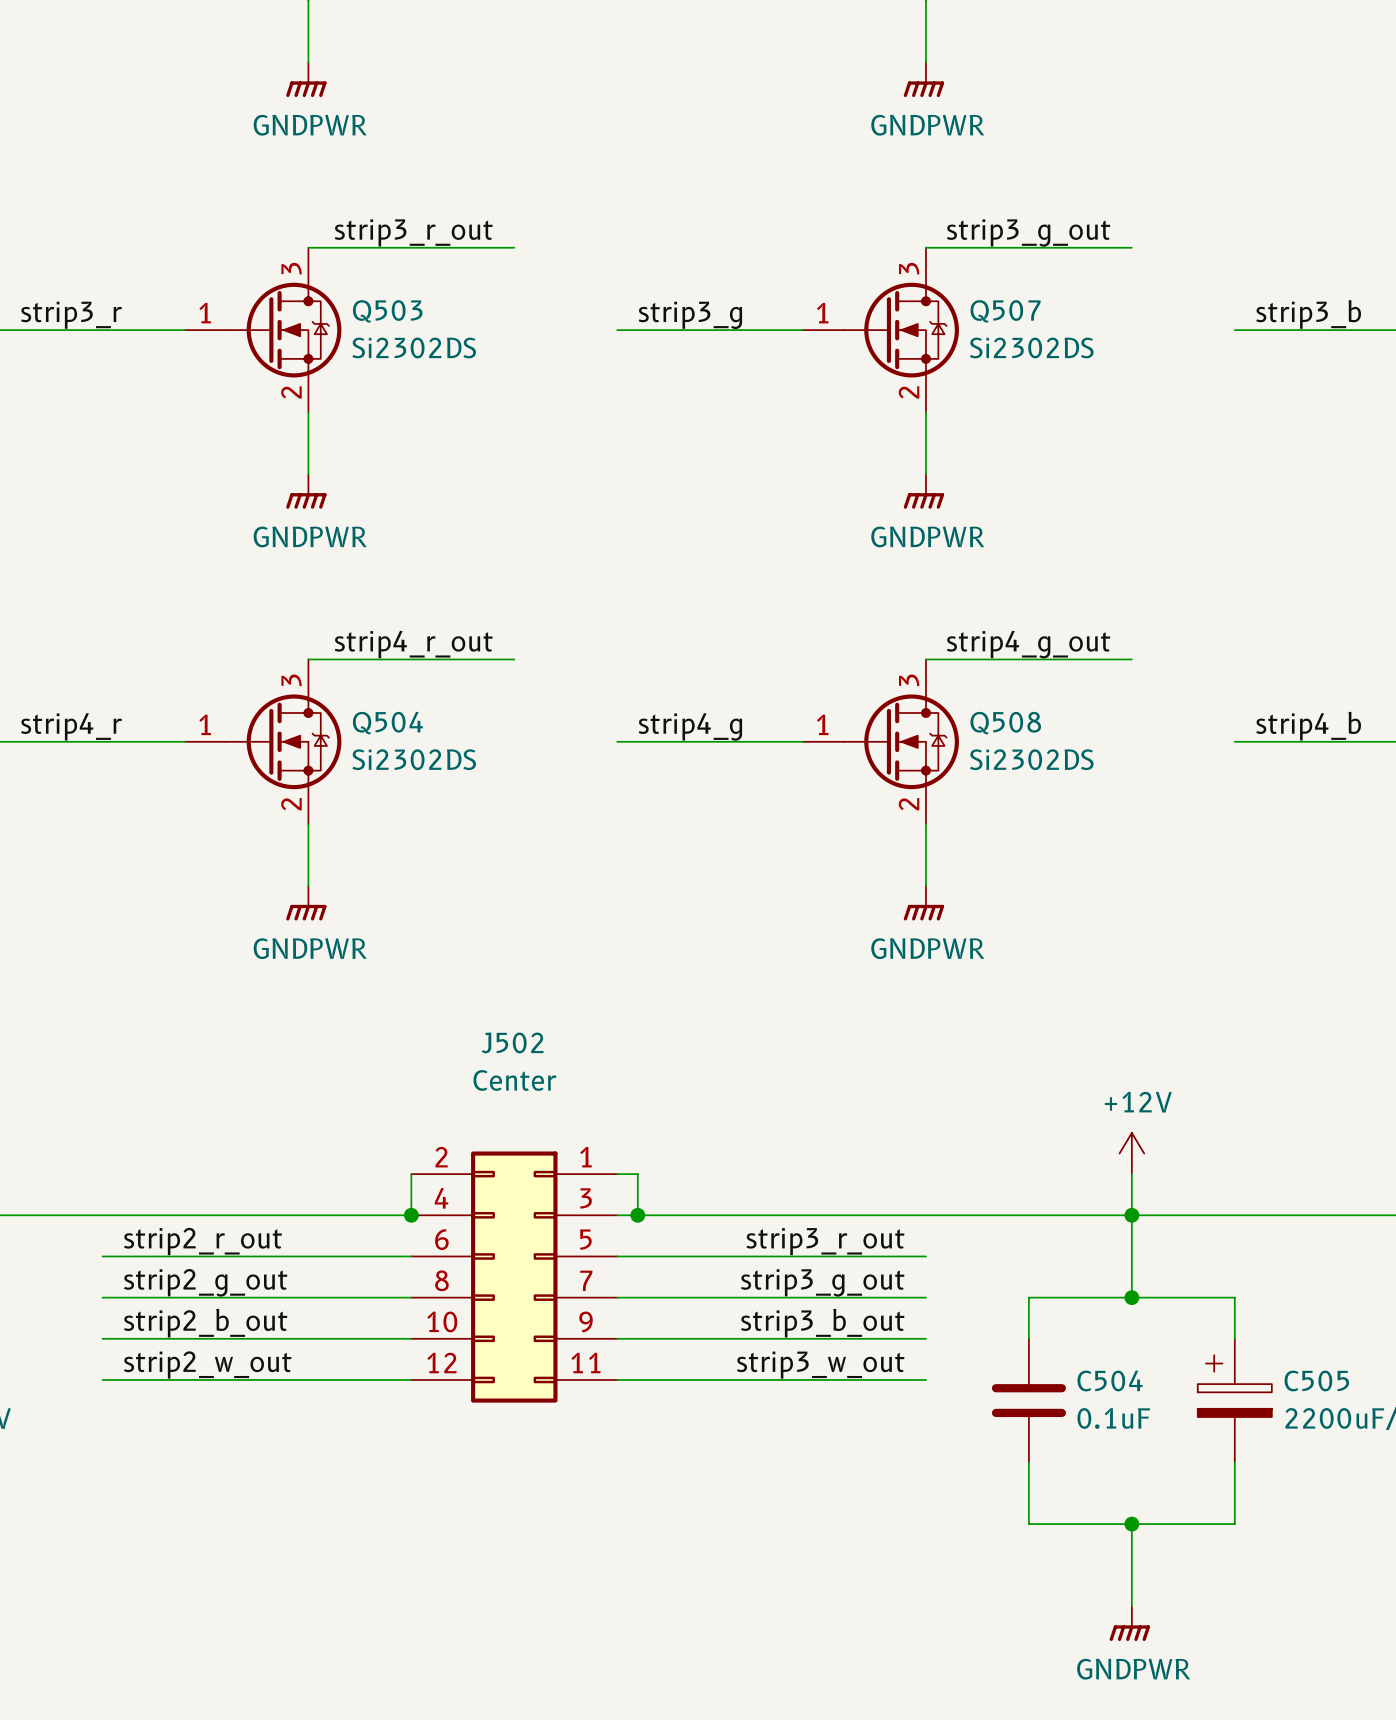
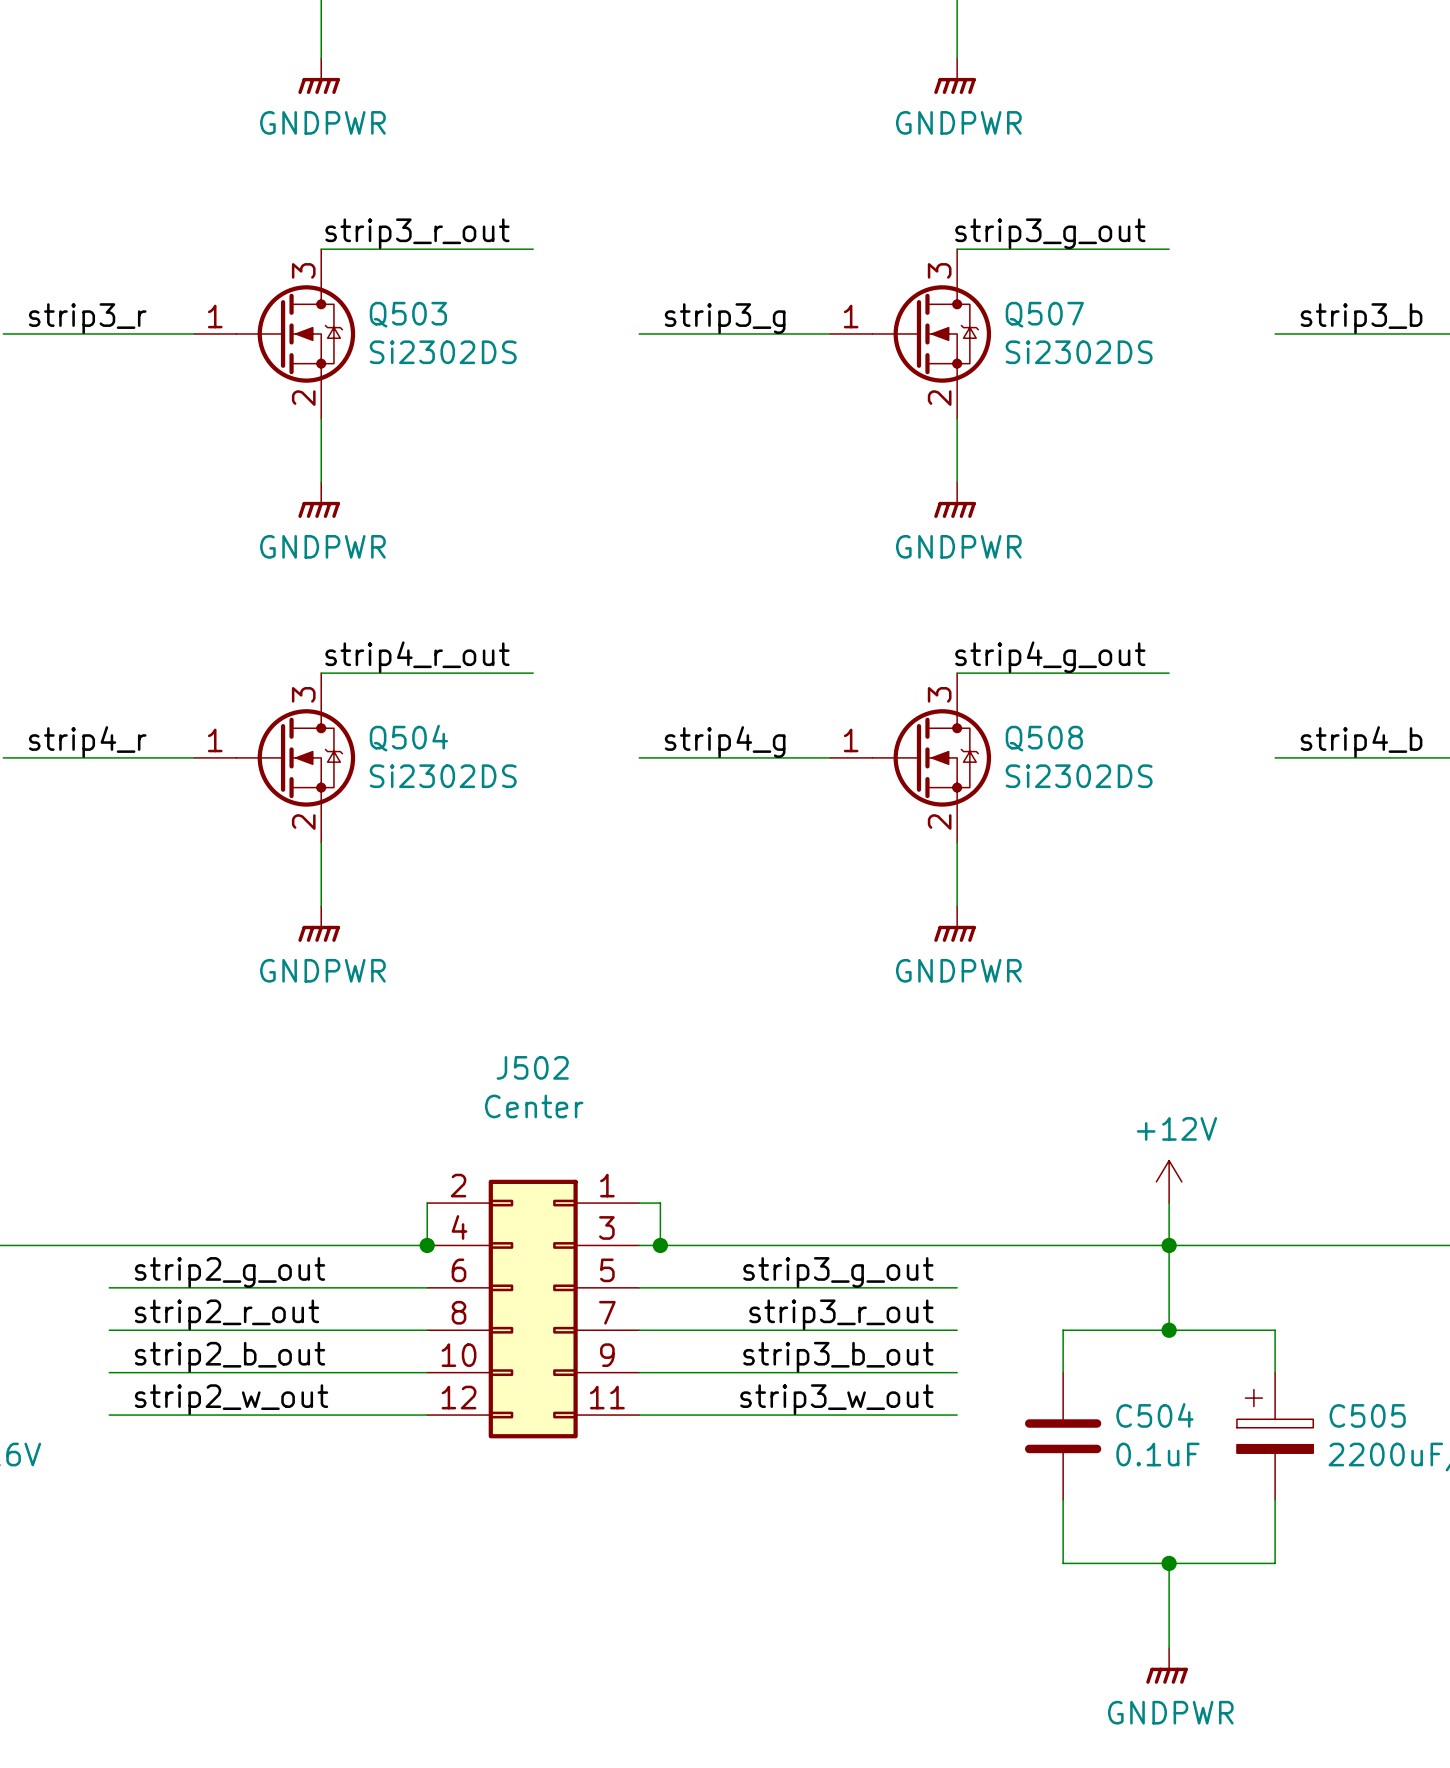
label: strip2_r_out (202, 1241) -> strip2_g_out (230, 1272)
label: strip3_r_out (825, 1241) -> strip3_g_out (838, 1272)
label: strip2_g_out (205, 1282) -> strip2_r_out (227, 1314)
label: strip3_g_out (822, 1282) -> strip3_r_out (841, 1314)

